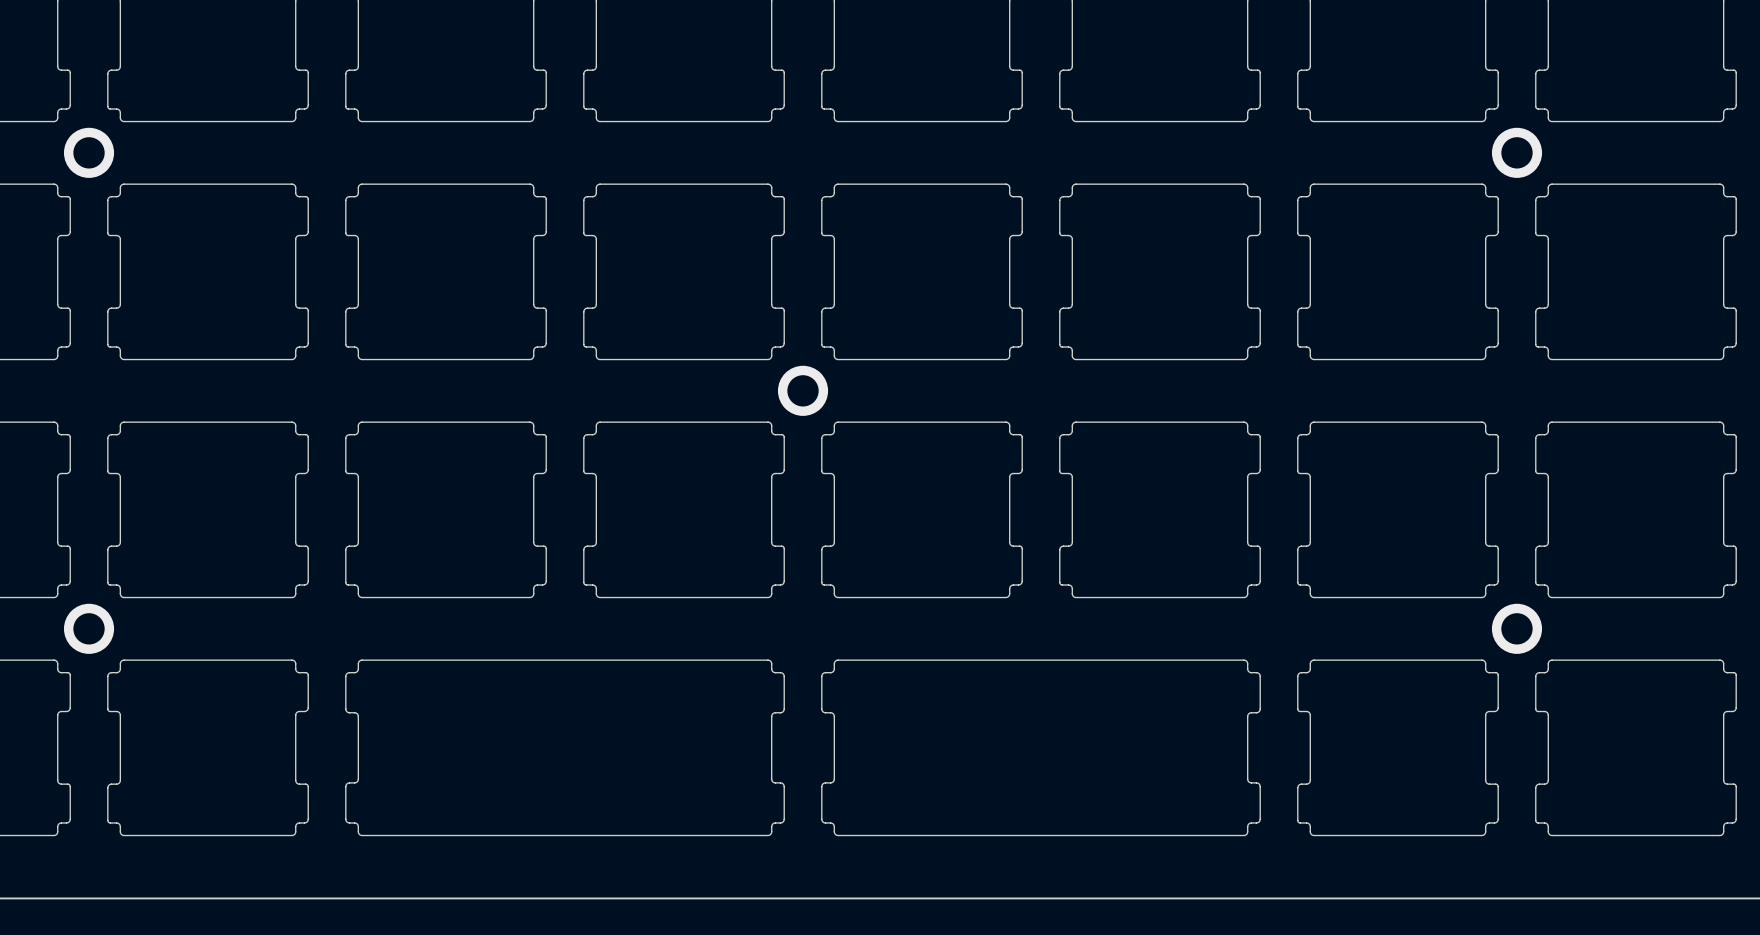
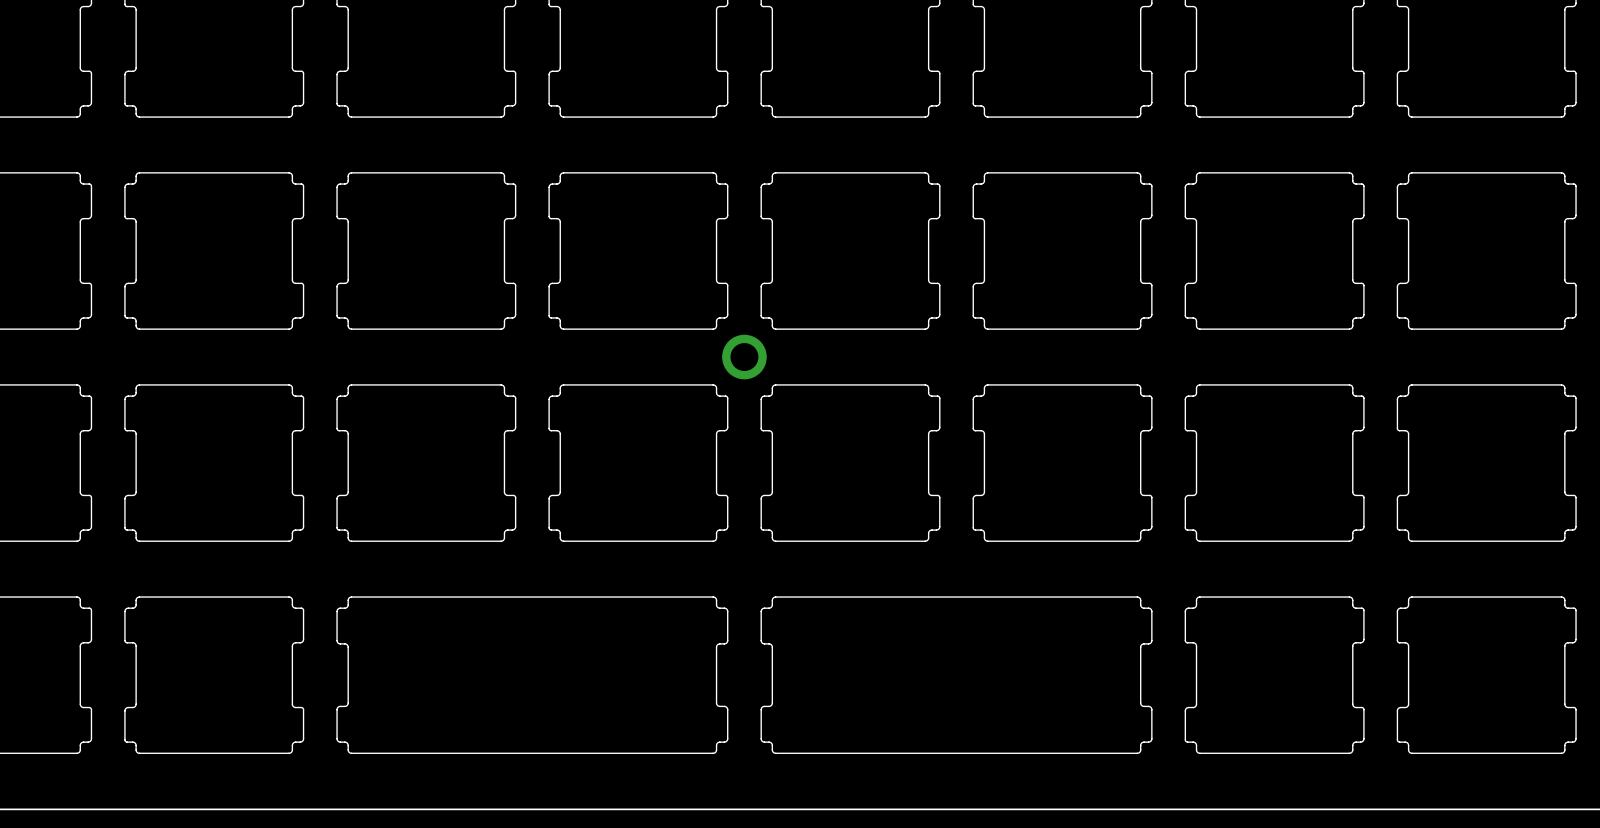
via: (89, 152) -> none
via: (1517, 152) -> none
via: (89, 628) -> none
via: (1516, 628) -> none

